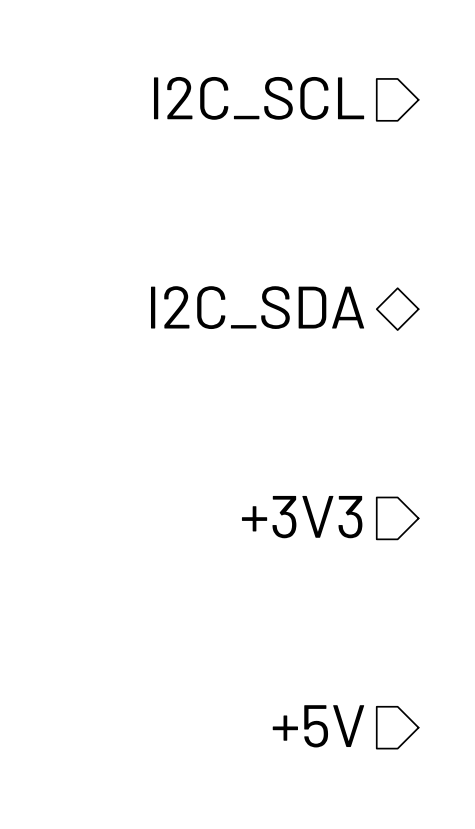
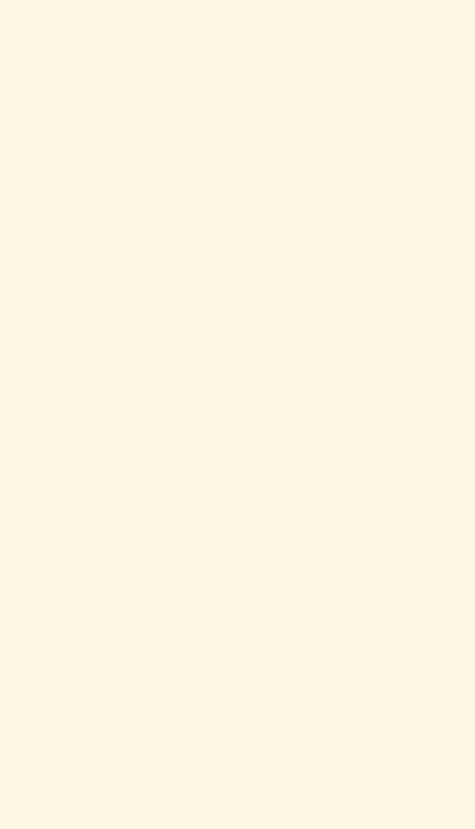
hierarchical label: I2C_SCL (259, 98) -> none
hierarchical label: I2C_SDA (257, 307) -> none
hierarchical label: +3V3 (302, 517) -> none
hierarchical label: +5V (318, 726) -> none

